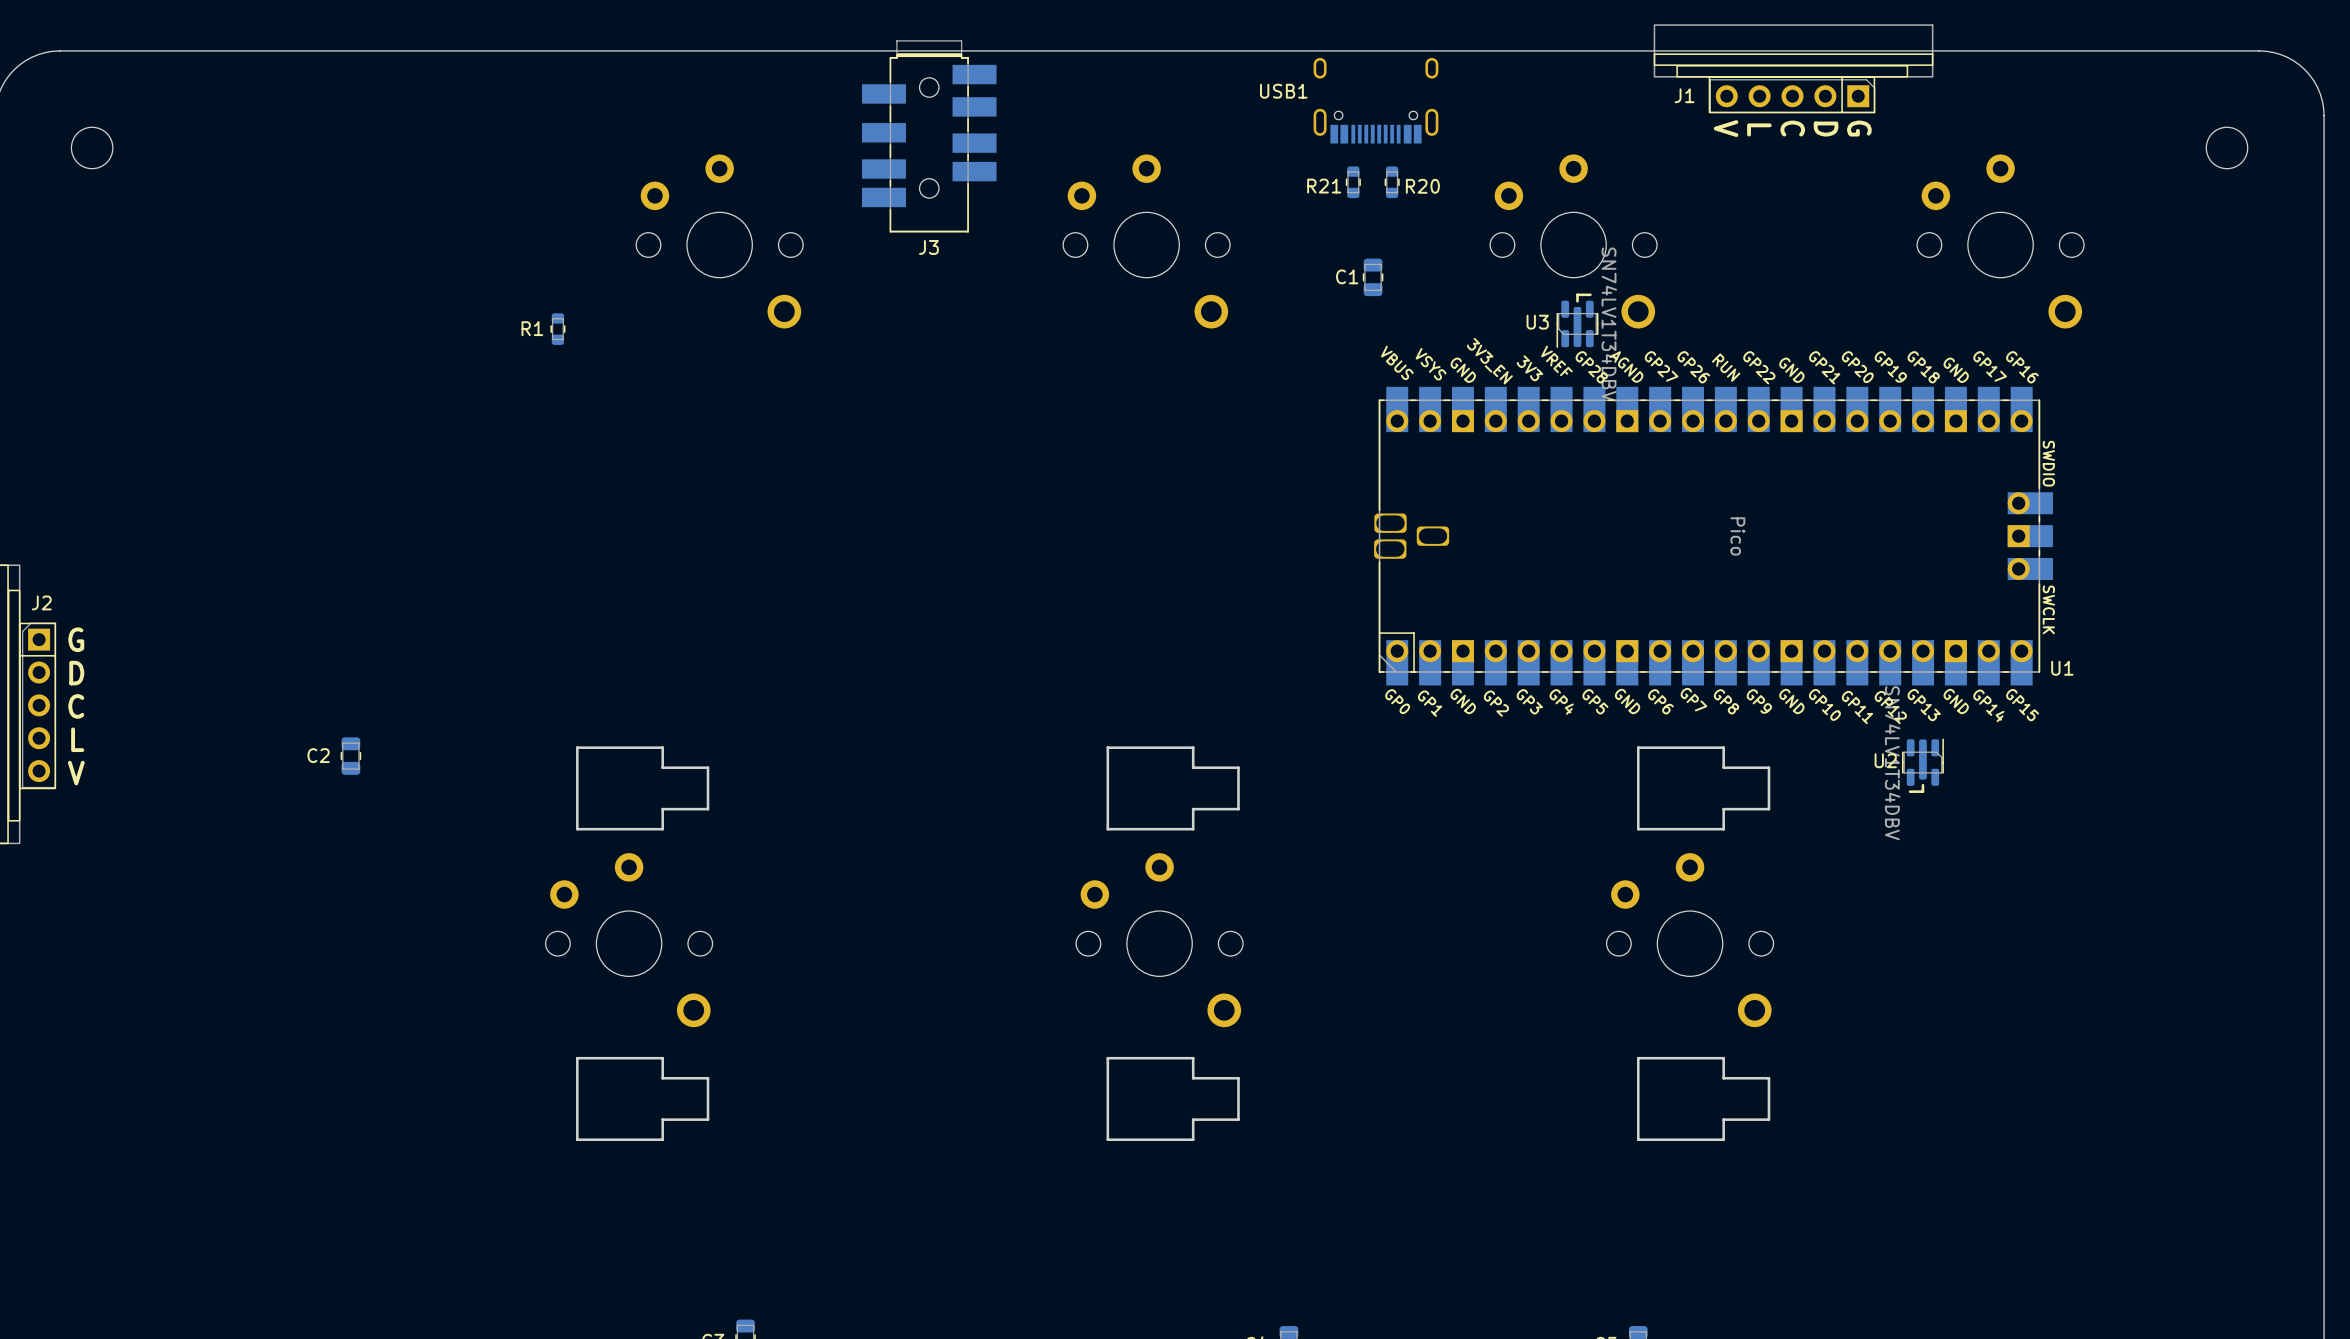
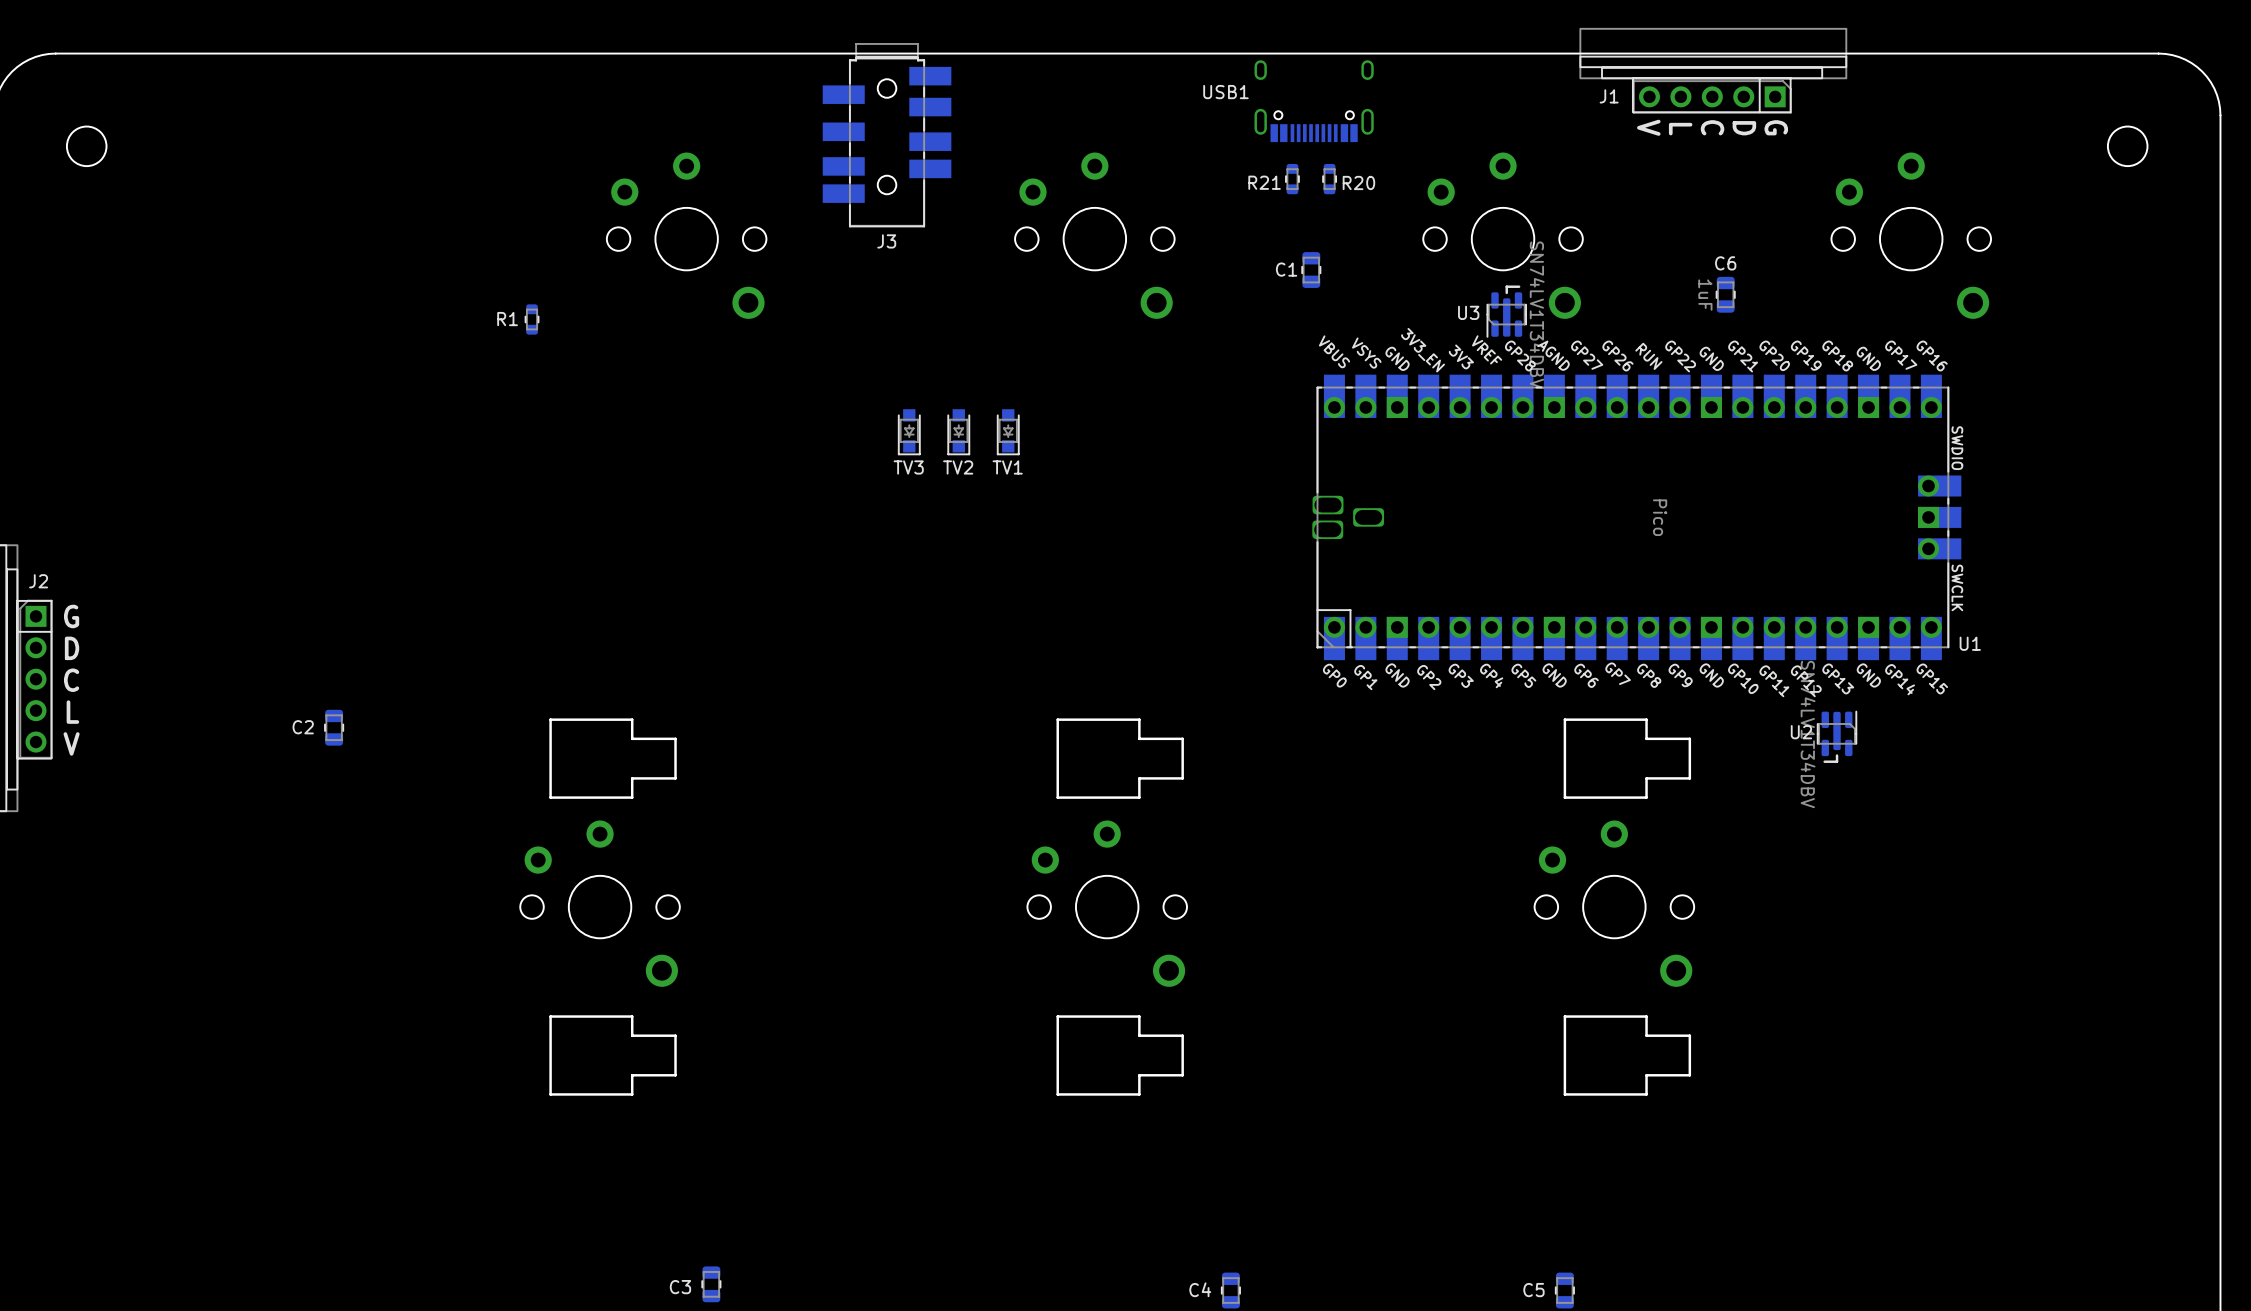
C6: none -> 1uF (1725, 294)
TV3: none -> (909, 432)
TV2: none -> (958, 432)
TV1: none -> (1008, 432)

